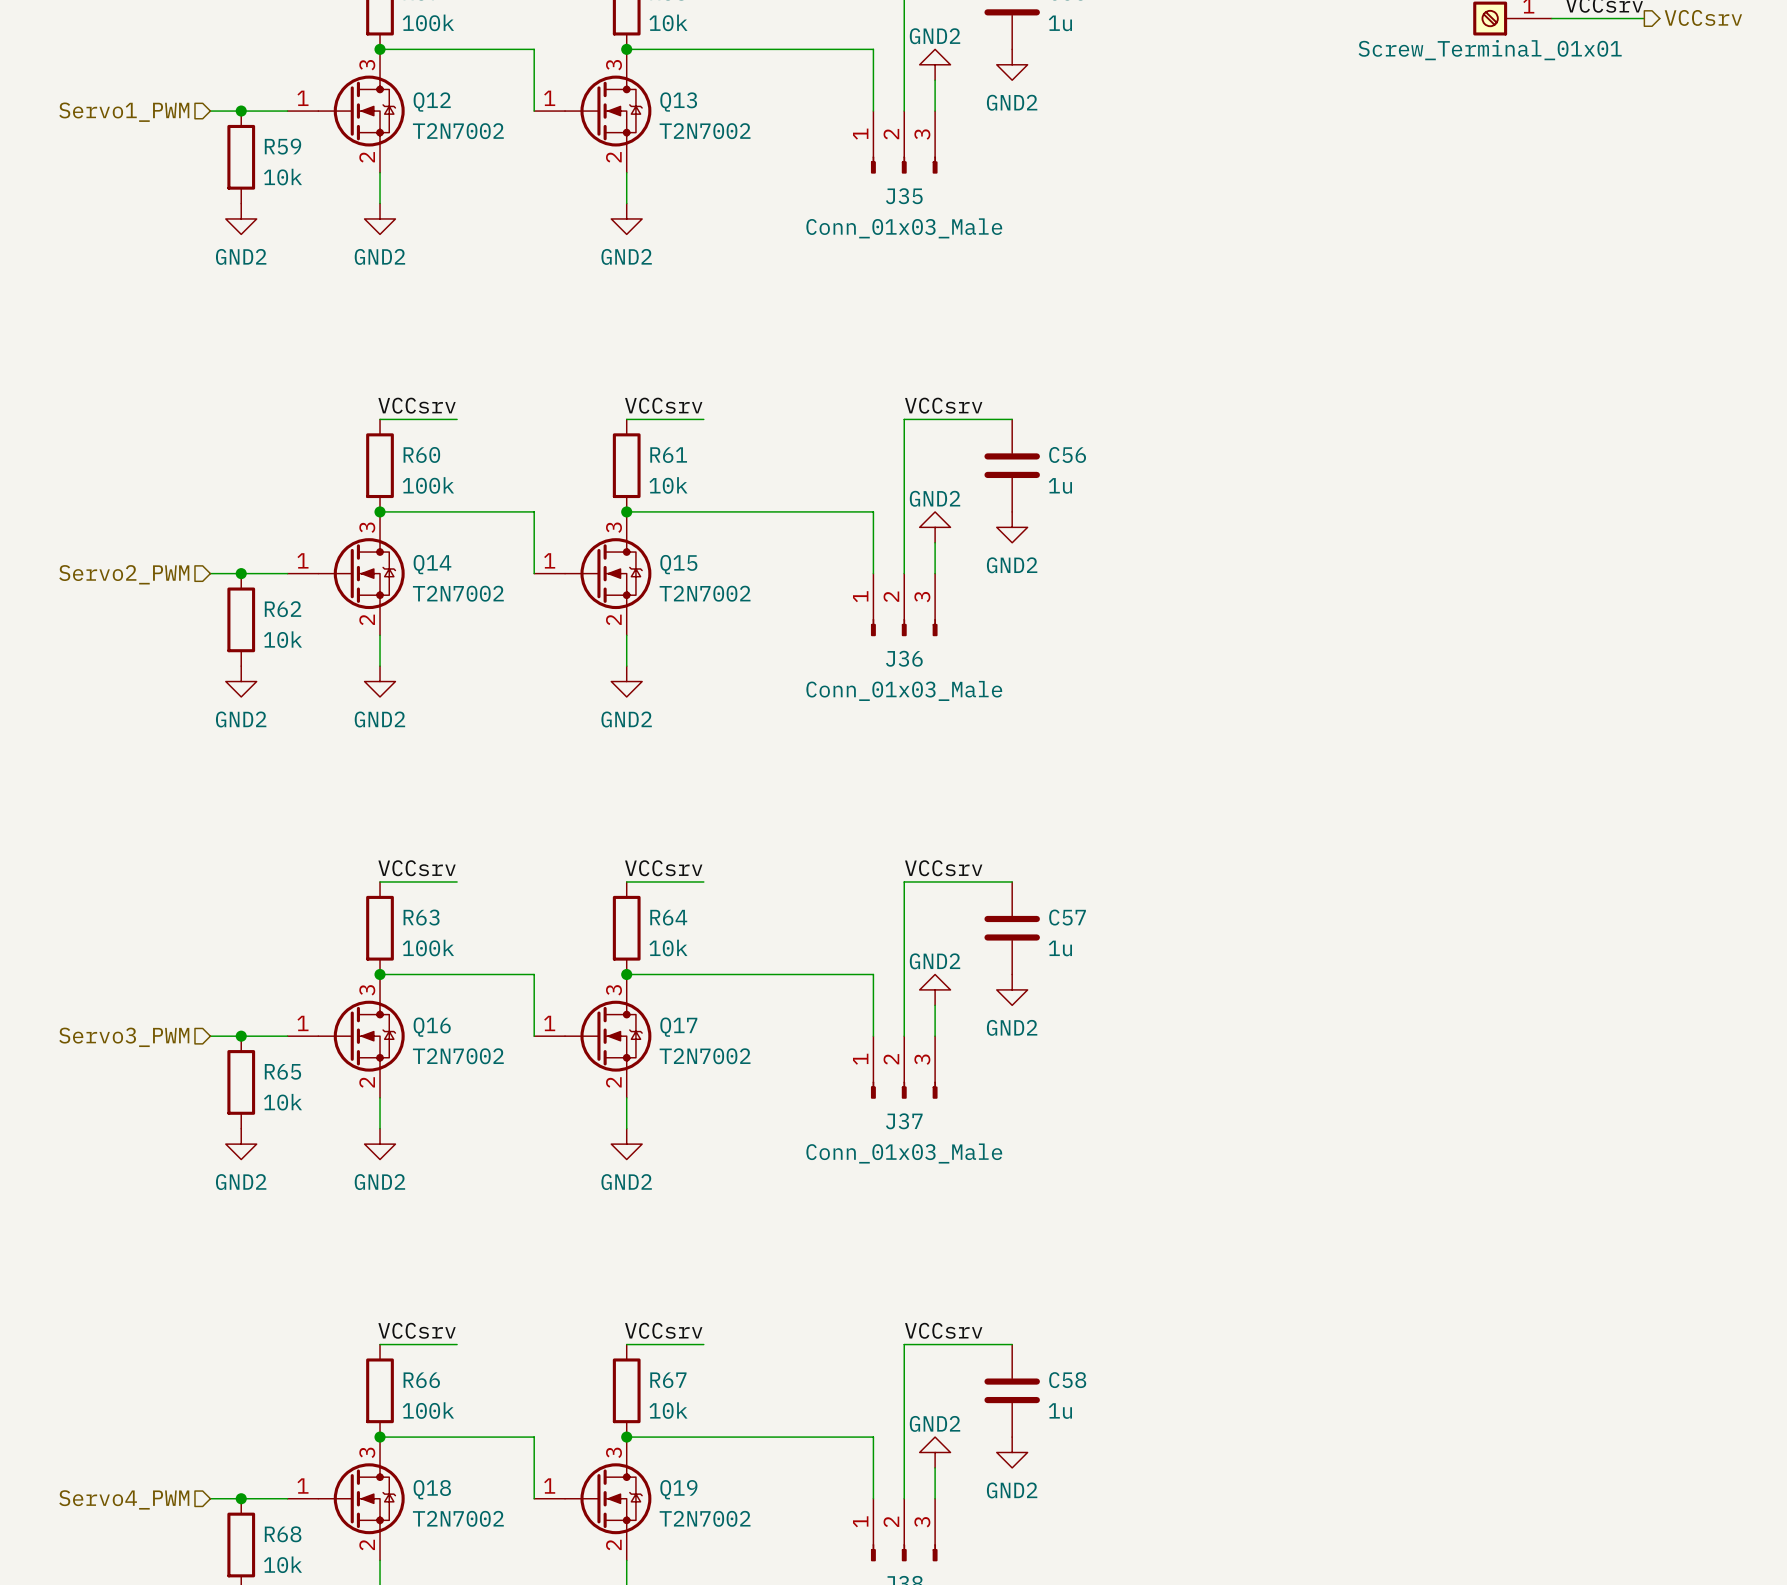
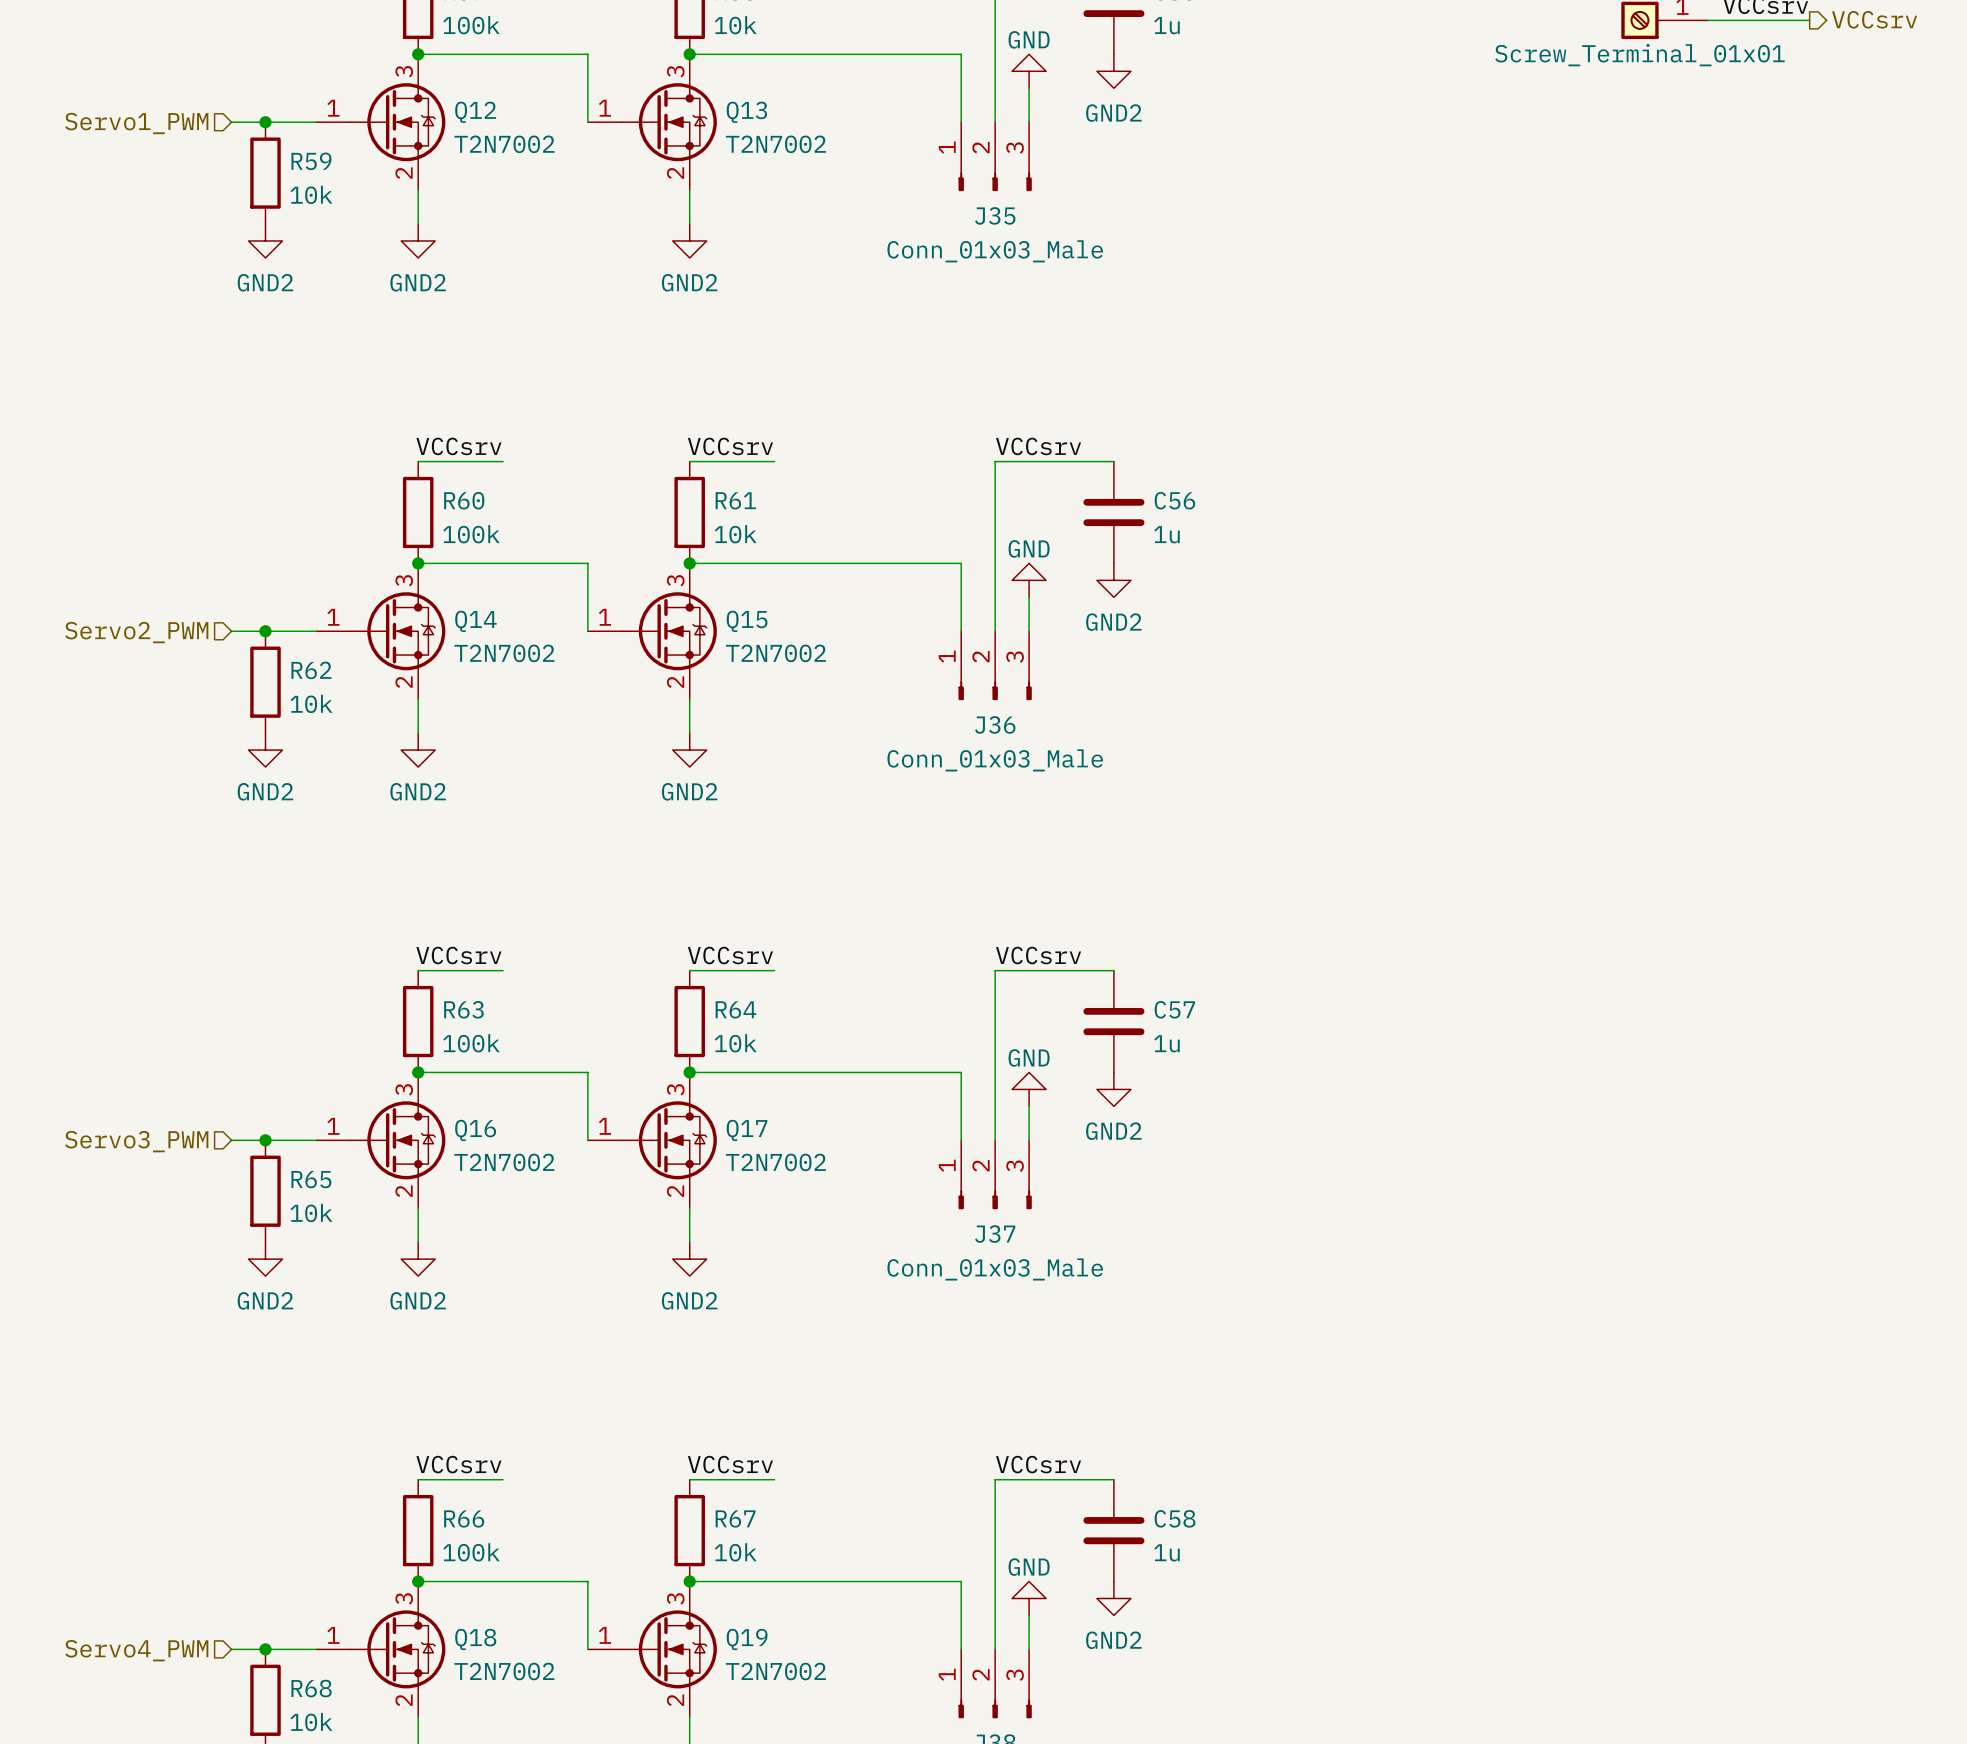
power symbol: GND2 (935, 64) -> GND (1029, 71)
power symbol: GND2 (935, 527) -> GND (1029, 580)
power symbol: GND2 (935, 989) -> GND (1029, 1089)
power symbol: GND2 (935, 1452) -> GND (1029, 1598)

